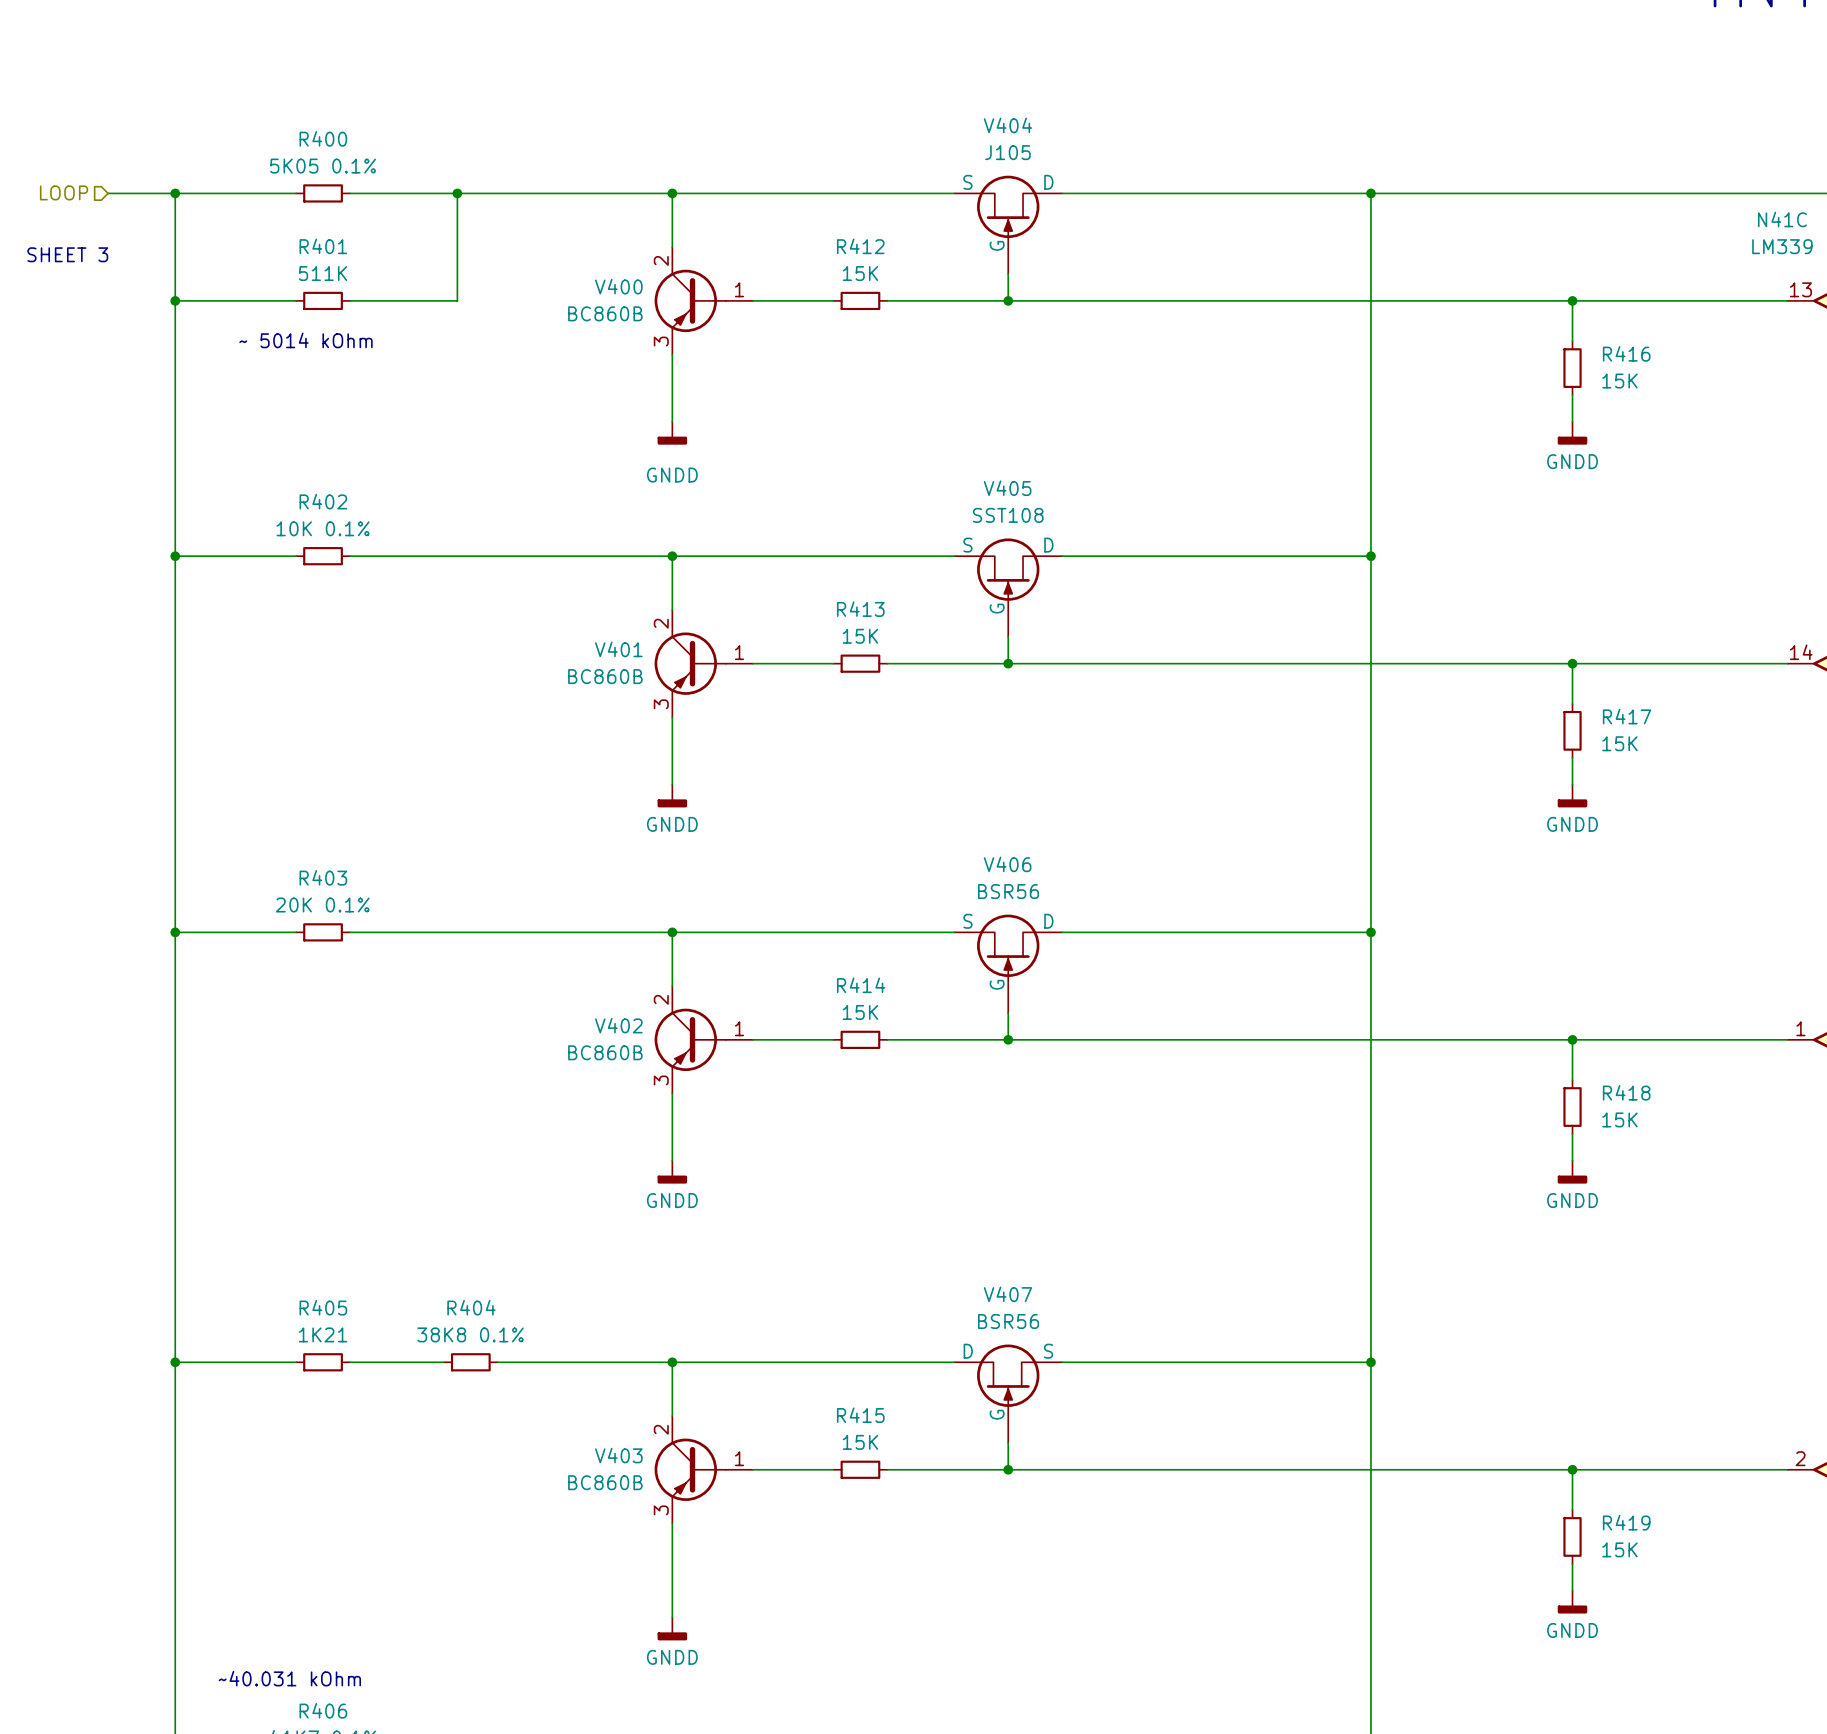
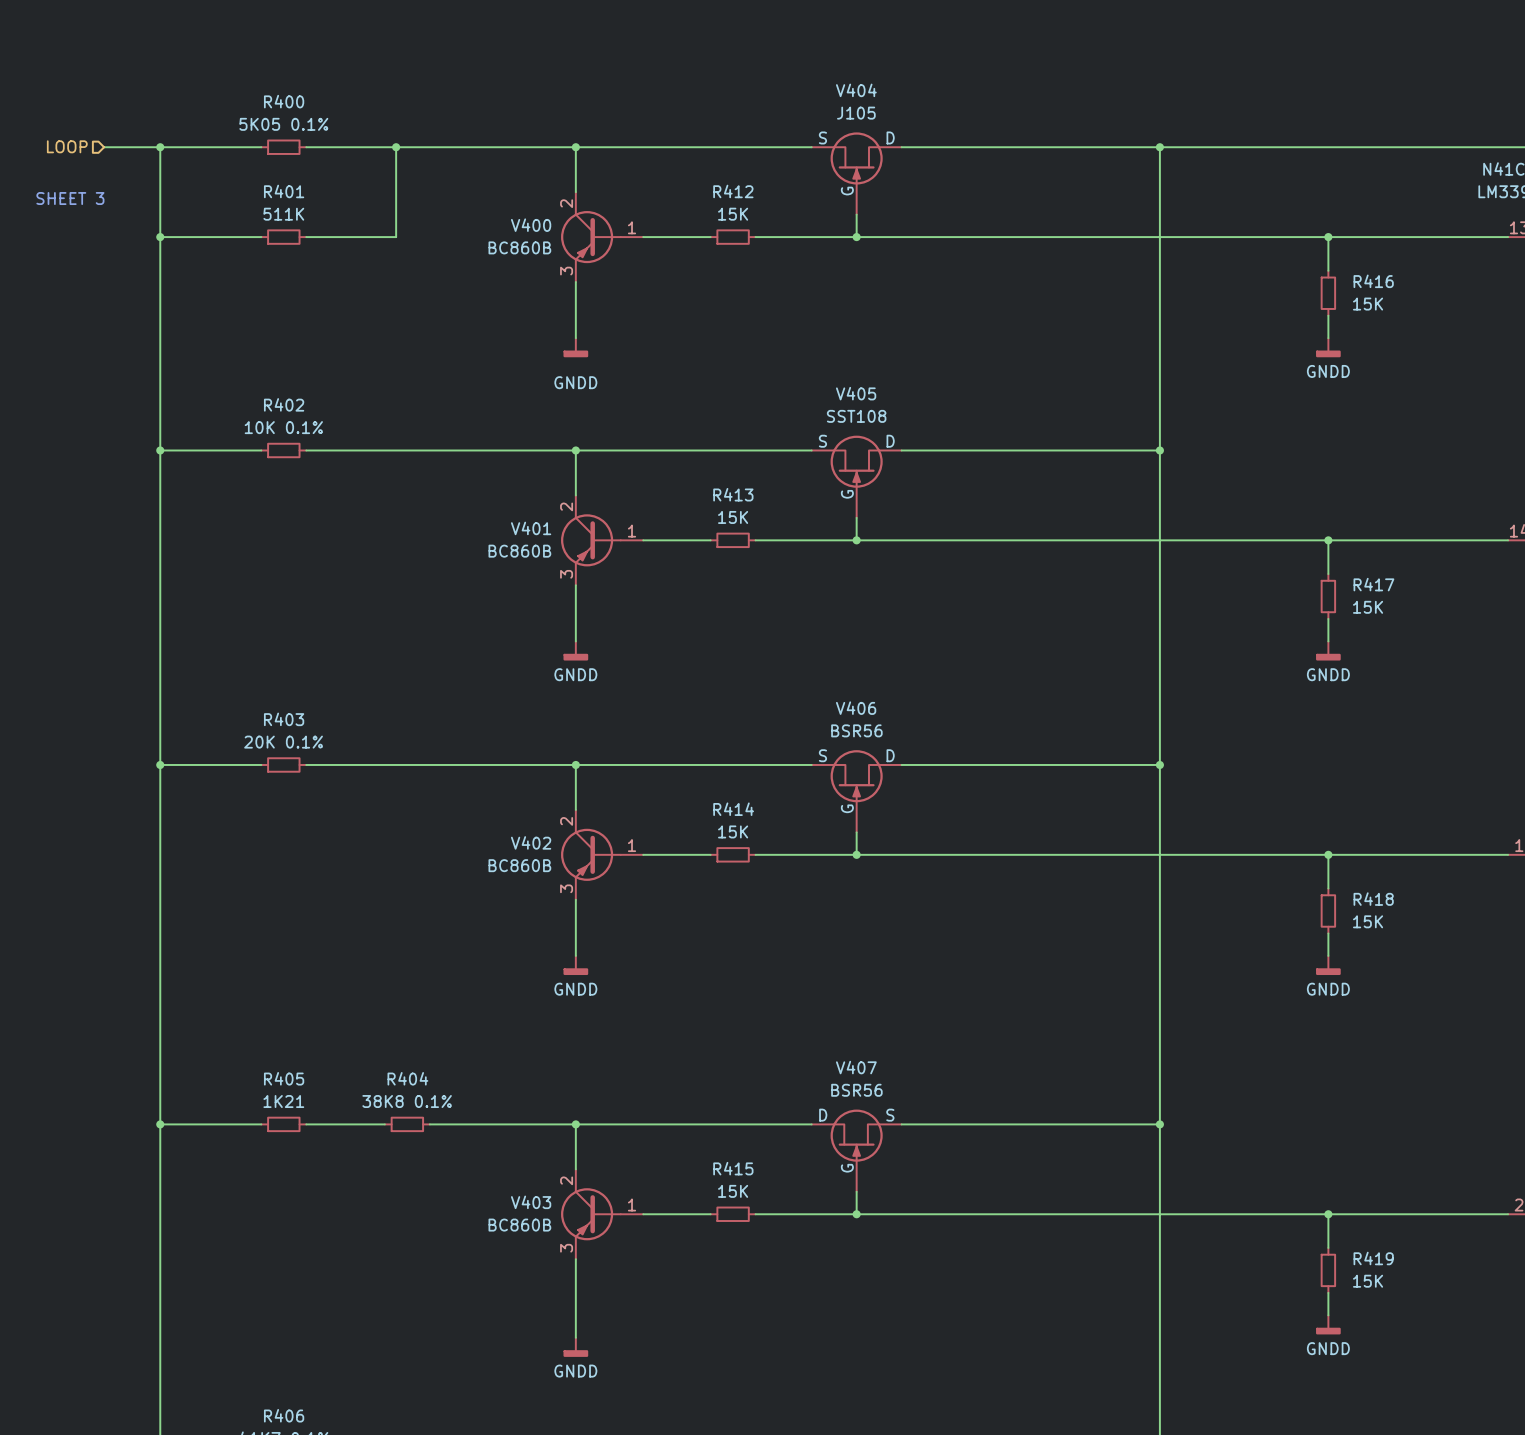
text: ~ 5014 kOhm (305, 340) -> none
text: ~40.031 kOhm (289, 1678) -> none

